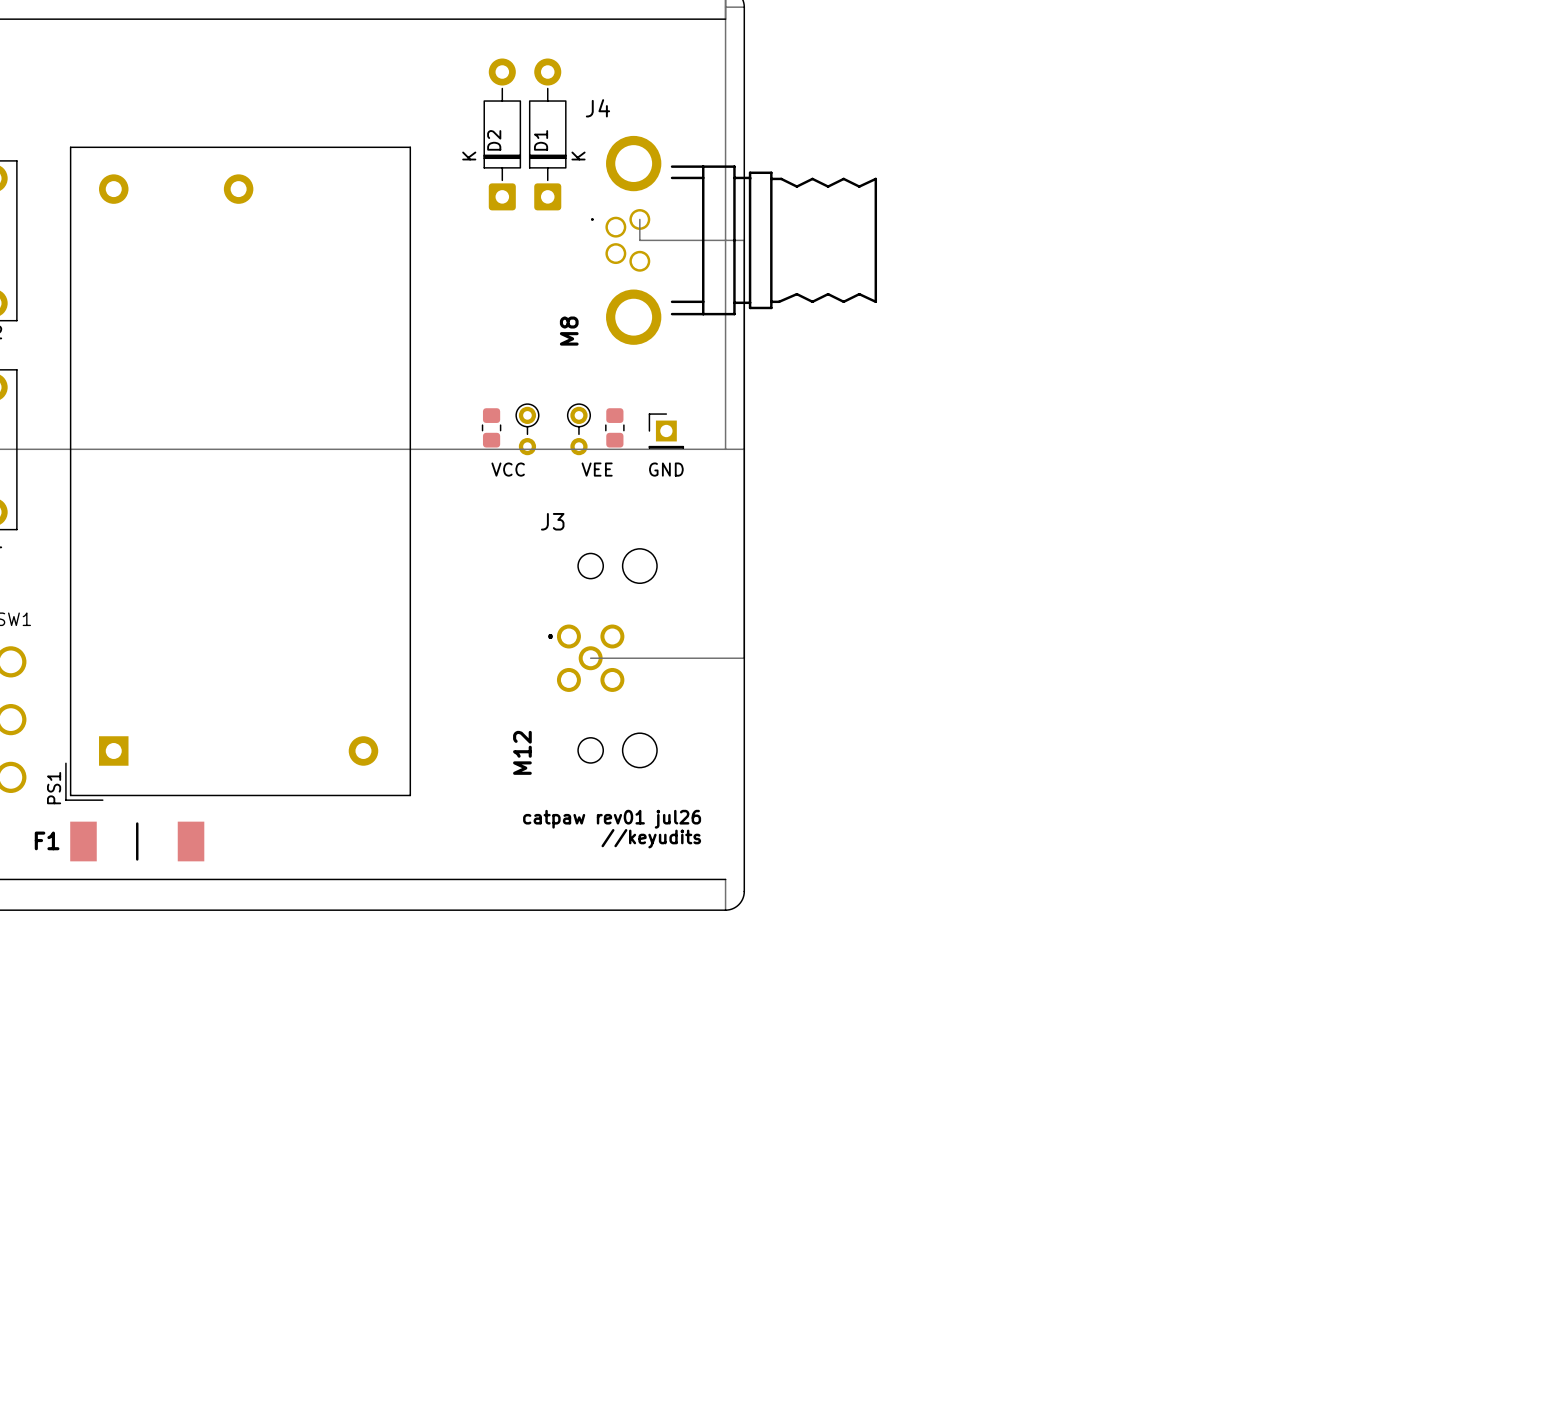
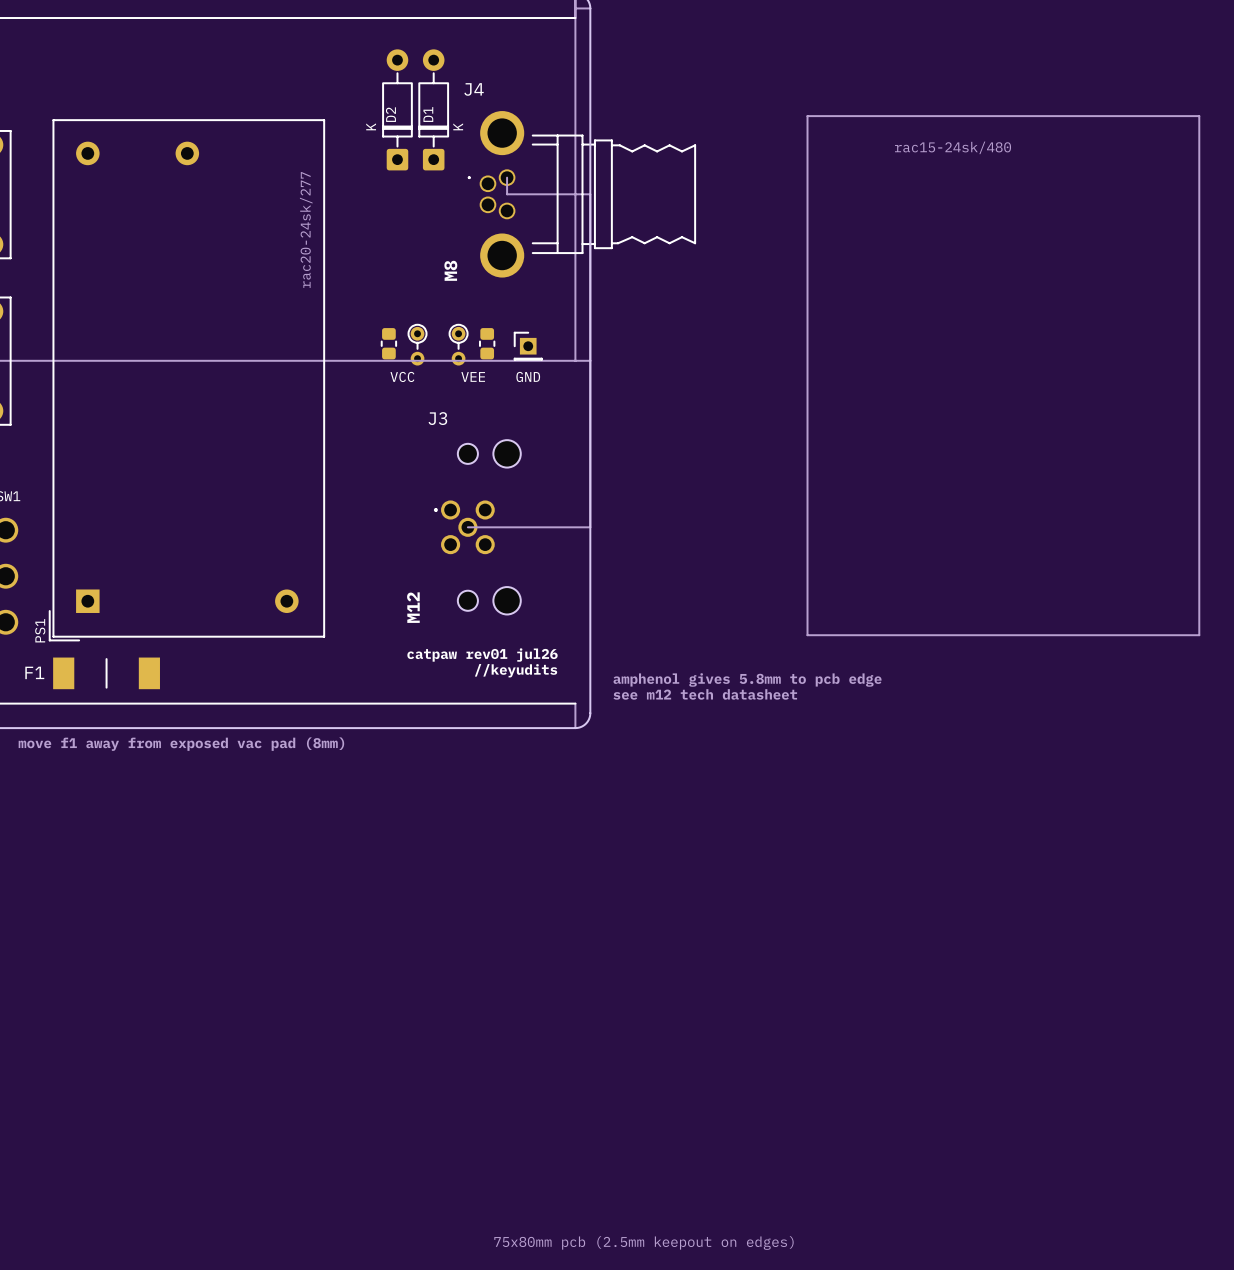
line: none -> (807, 116) (1199, 116) (1199, 635) (807, 635) (807, 116)
text: none -> rac15-24sk/480 (953, 147)
text: none -> rac20-24sk/277 (306, 230)
text: none -> amphenol gives 5.8mm to pcb edge (747, 679)
text: none -> see m12 tech datasheet (705, 694)
text: none -> move f1 away from exposed vac pad (8mm) (181, 744)

